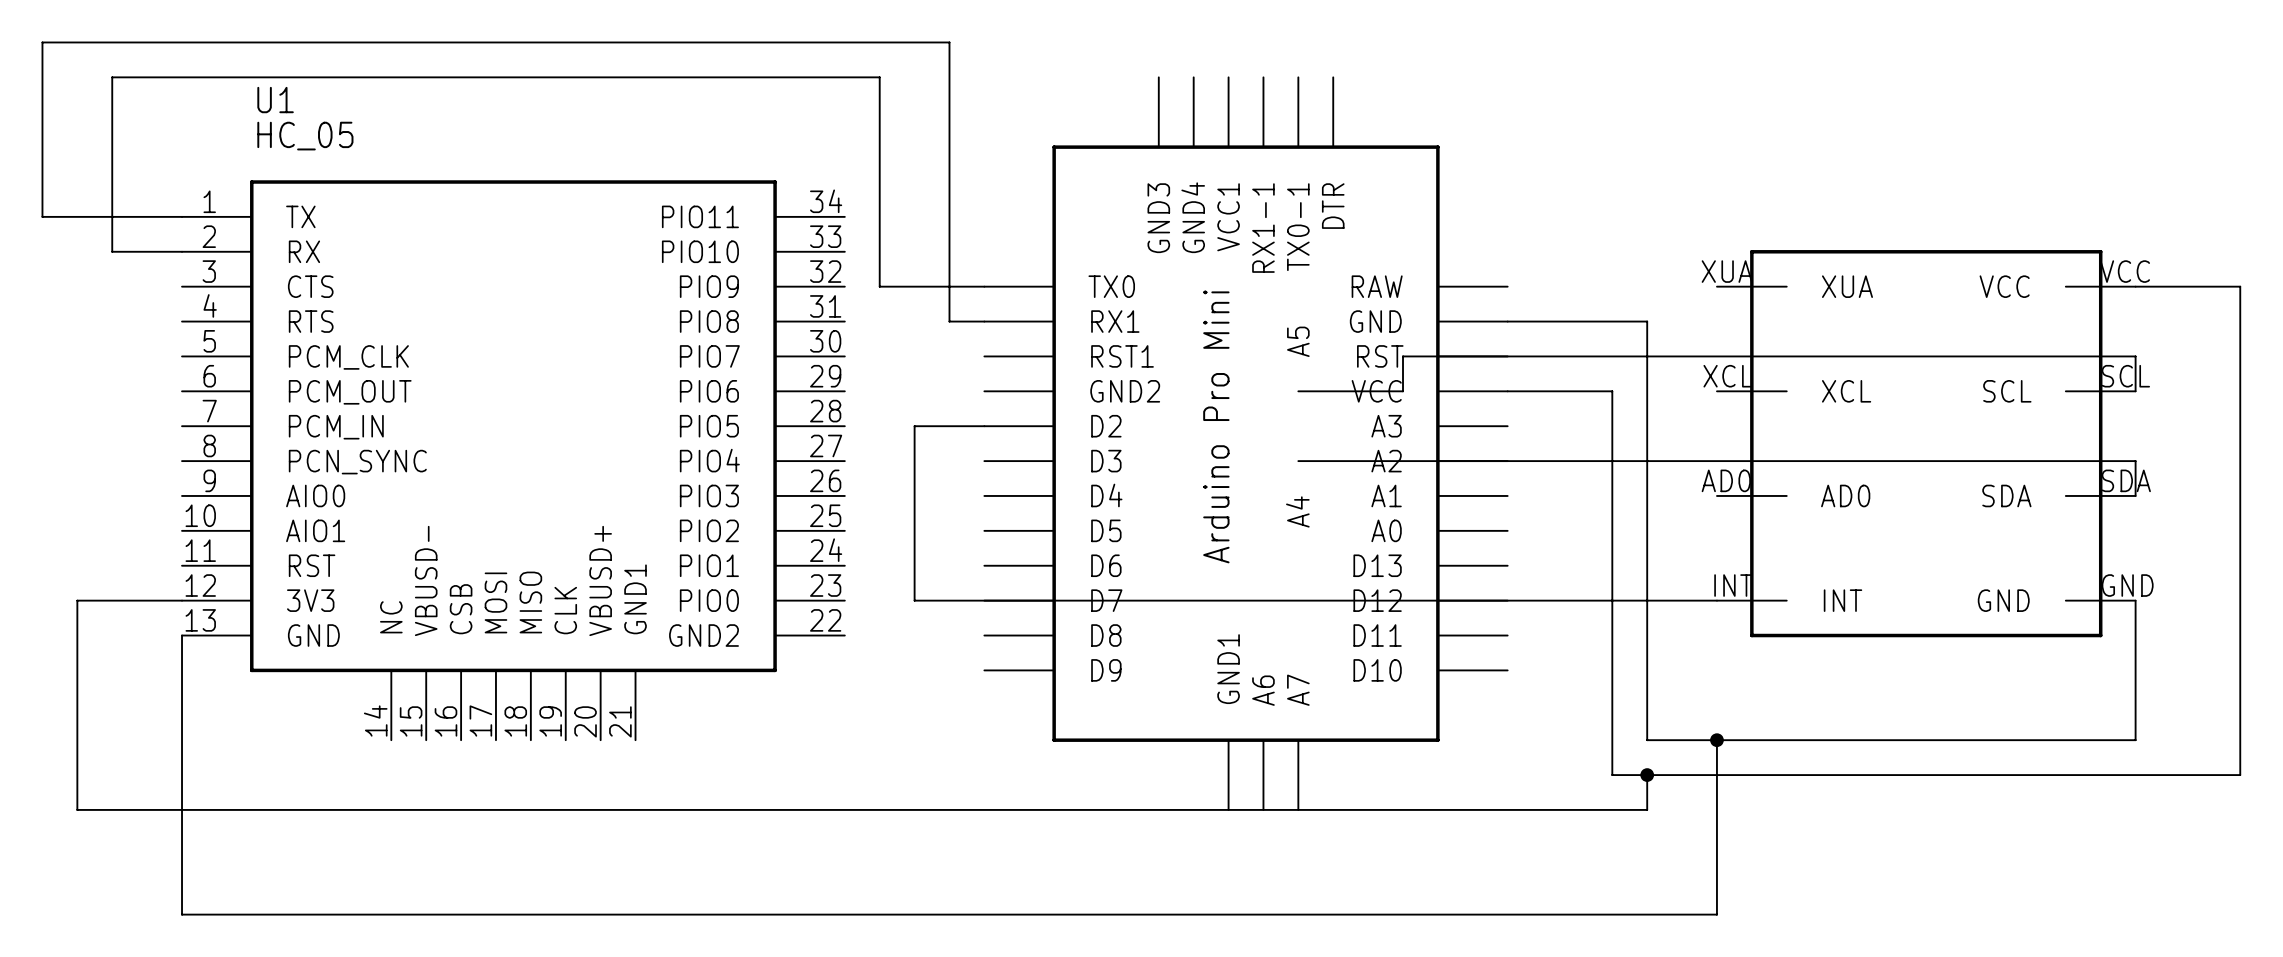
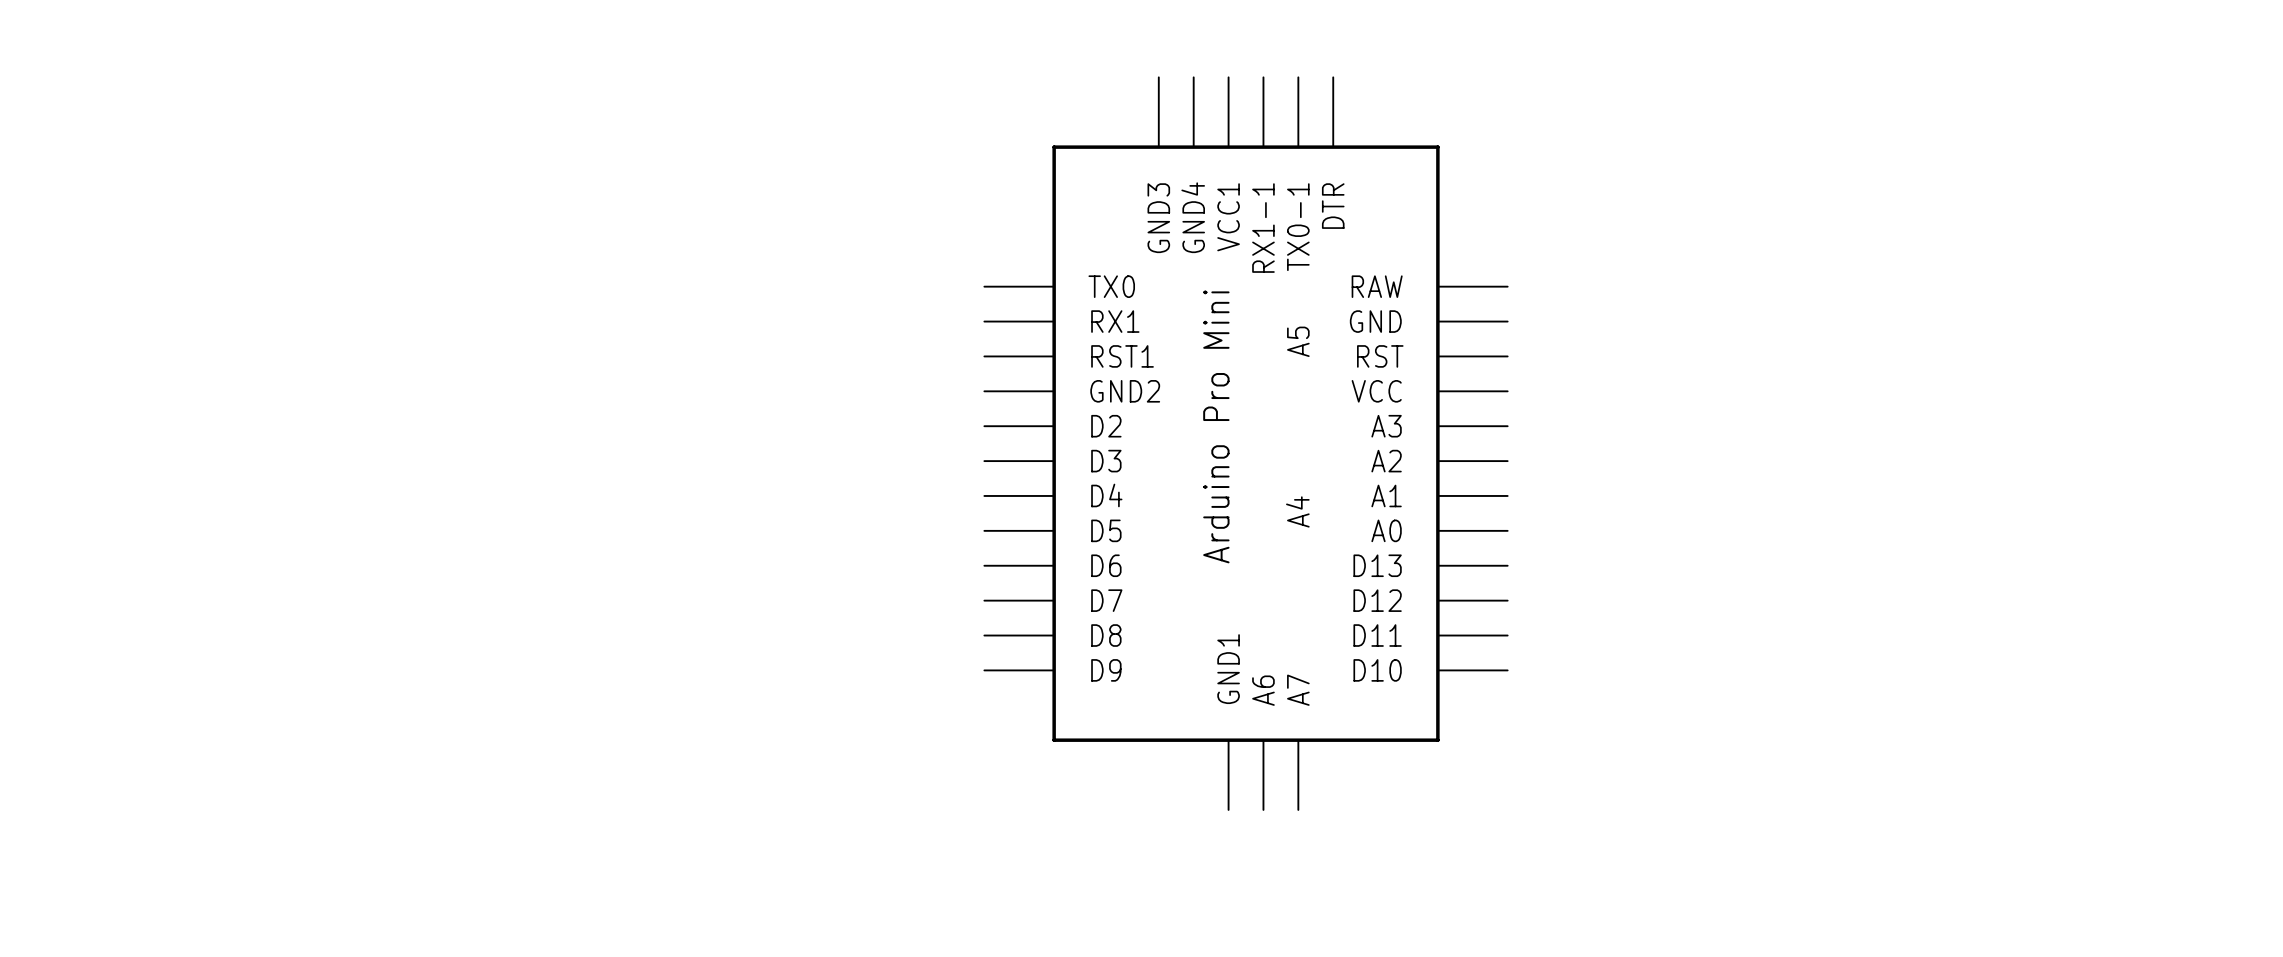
wire: (182, 216) (42, 216) (42, 42) (949, 42) (949, 321) (984, 321) -> none
wire: (182, 251) (112, 251) (112, 77) (879, 77) (879, 286) (984, 286) -> none
wire: (2135, 286) (2240, 286) (2240, 775) (1612, 775) (1612, 391) (1507, 391) -> none
wire: (1507, 321) (1647, 321) (1647, 740) (2135, 740) (2135, 600) -> none
wire: (1298, 391) (1403, 391) (1403, 356) (2135, 356) (2135, 391) -> none
wire: (984, 426) (914, 426) (914, 600) (1716, 600) -> none
part: (1926, 443) -> none
U1: HC_05 (513, 460) -> none
wire: (1298, 461) (2135, 461) (2135, 495) -> none
wire: (182, 600) (77, 600) (77, 809) (1647, 809) (1647, 775) -> none
wire: (182, 635) (182, 914) (1716, 914) (1716, 740) -> none
junction: (1716, 740) -> none
junction: (1647, 775) -> none

